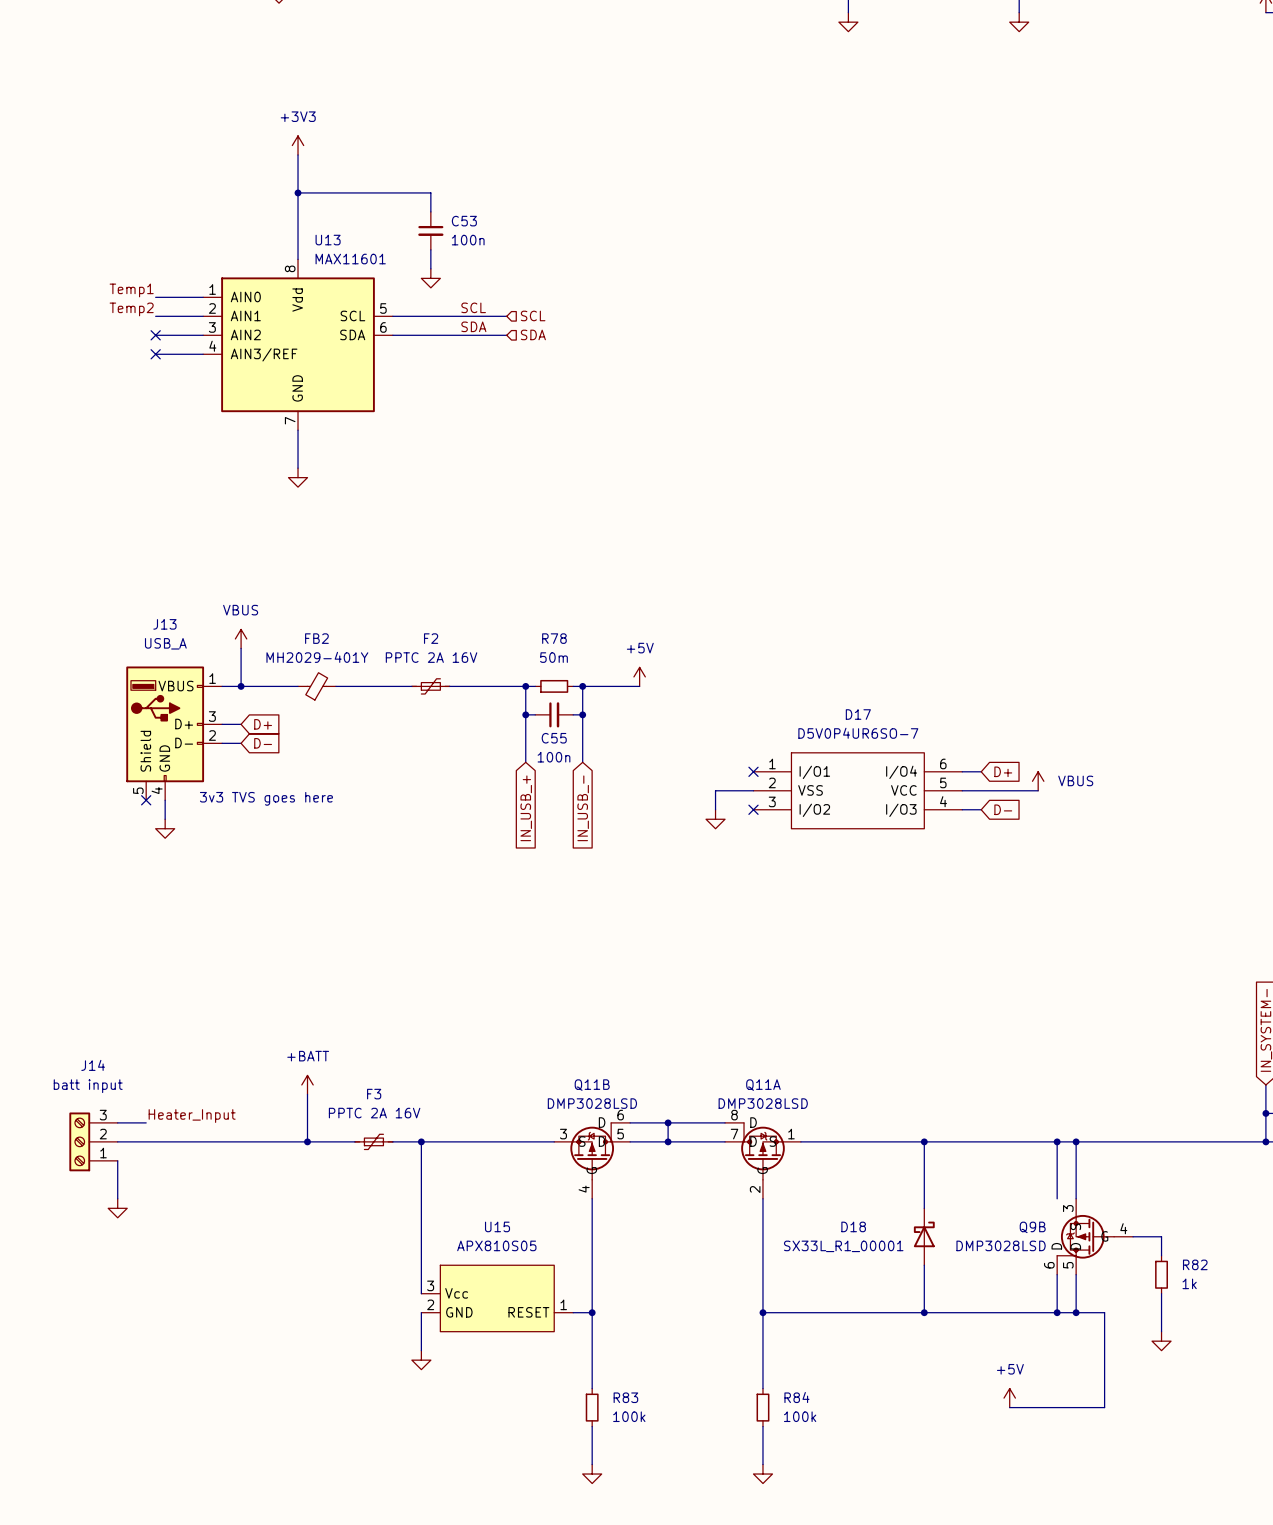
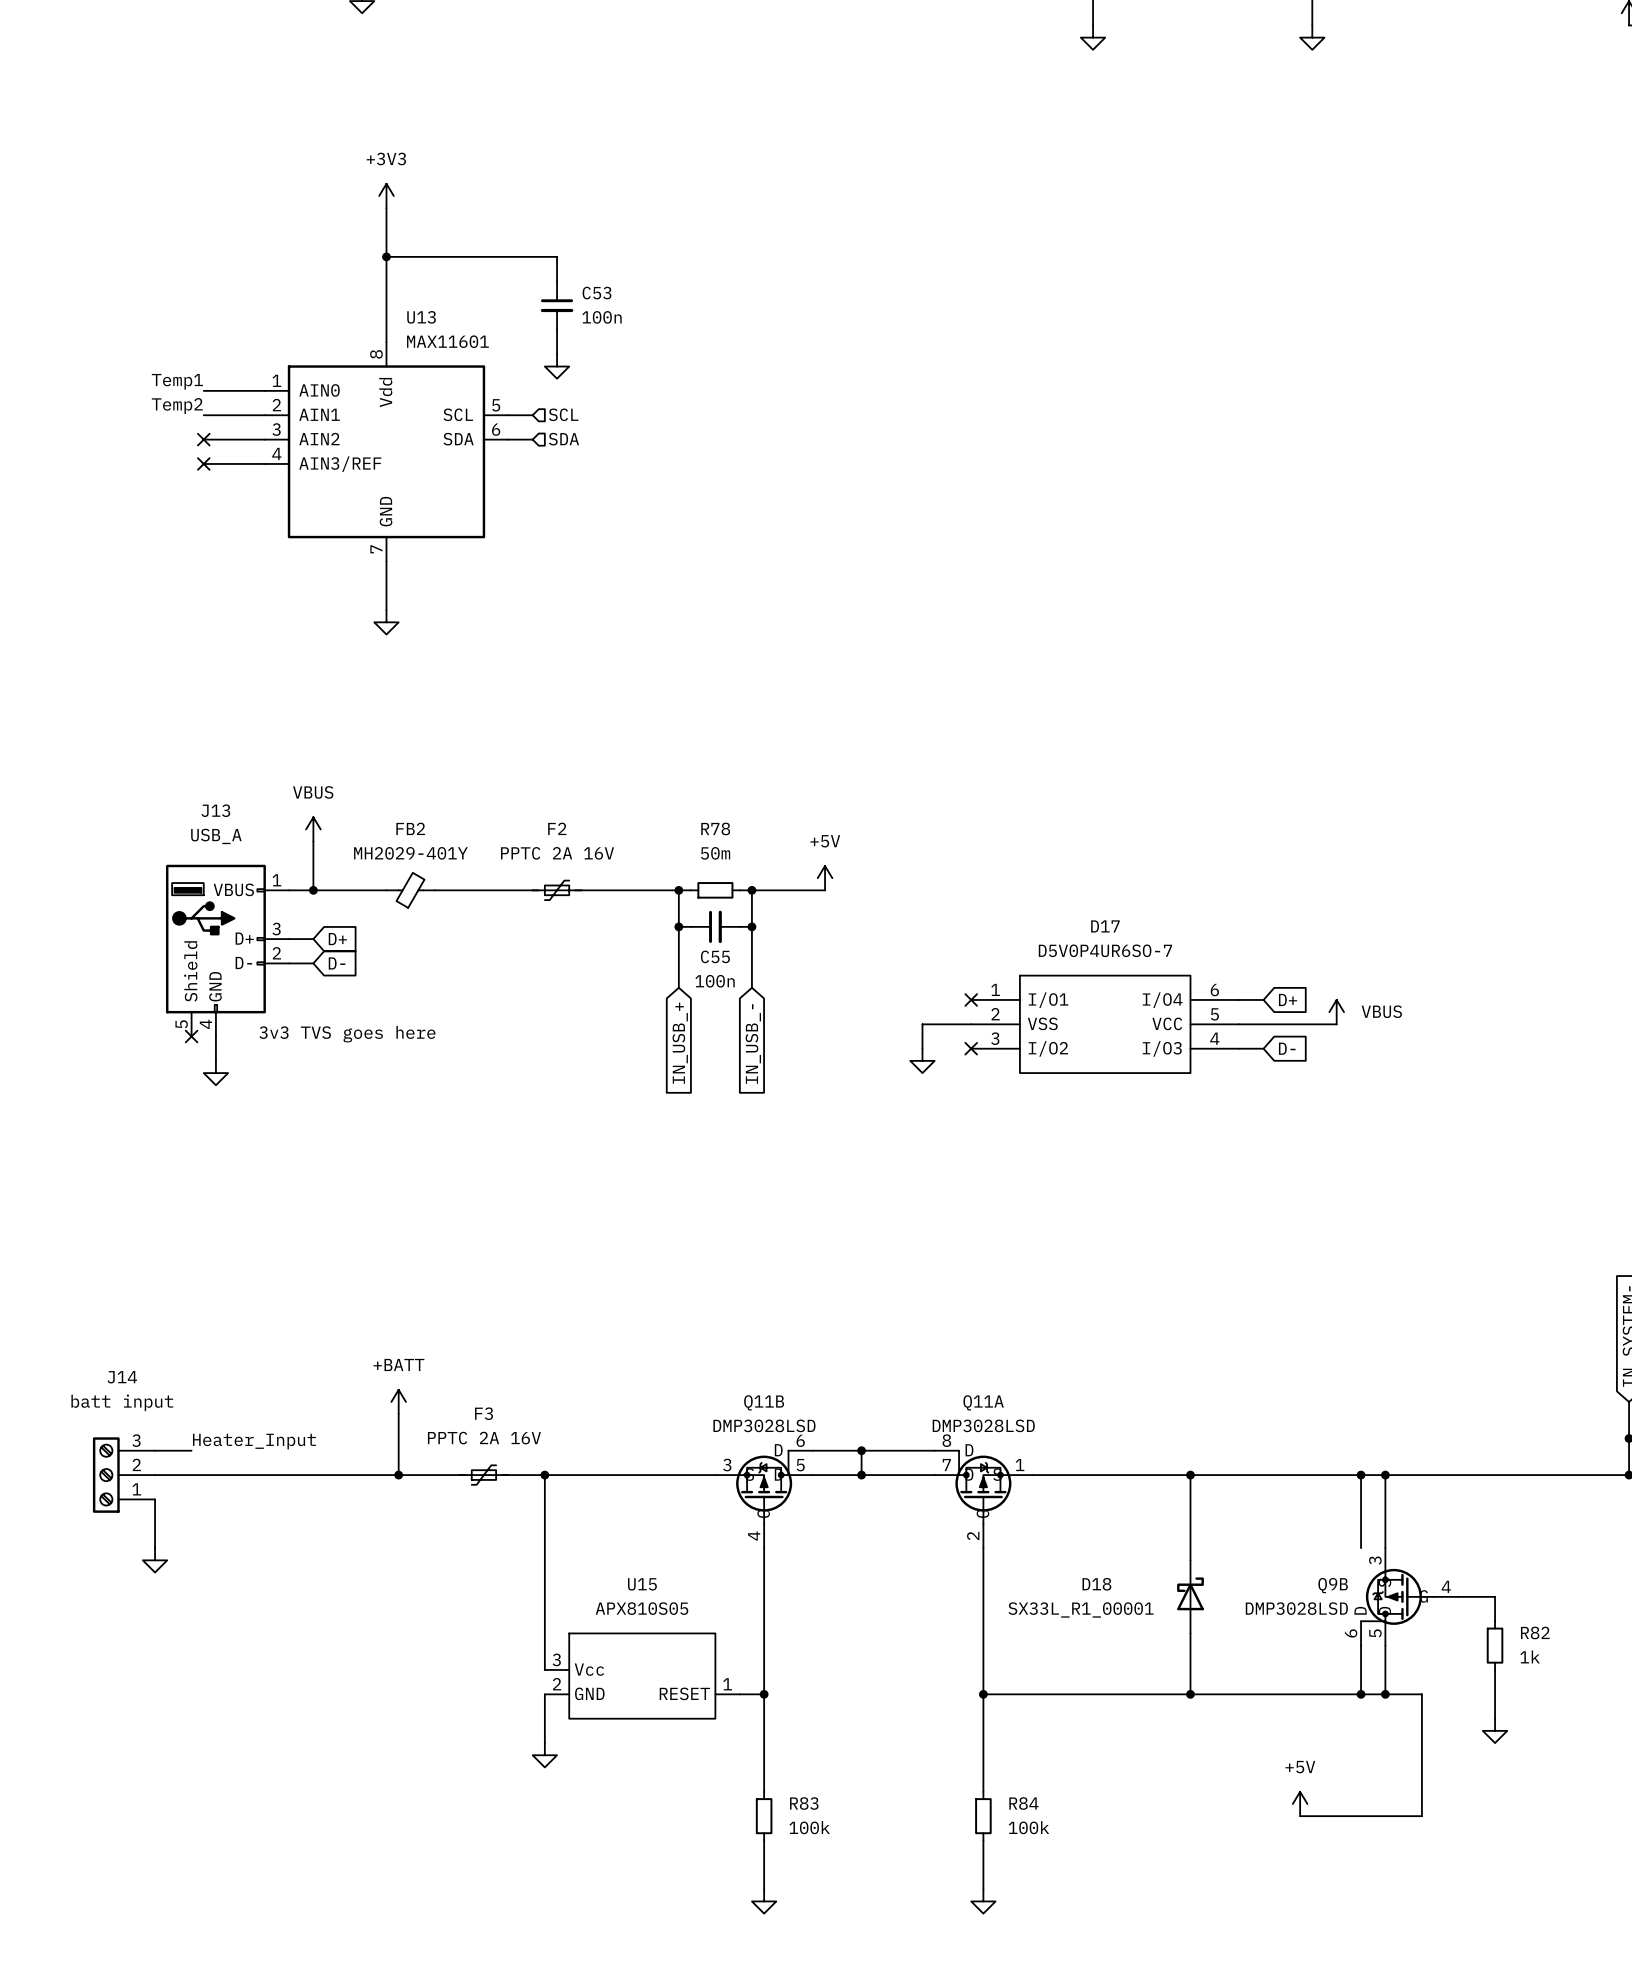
label: SCL (473, 307) -> none
hierarchical label position: SCL (533, 315) -> SCL (563, 414)
wire: (411, 316) (506, 316) -> none
label: SDA (473, 326) -> none
hierarchical label position: SDA (533, 334) -> SDA (563, 439)
wire: (411, 335) (506, 335) -> none

